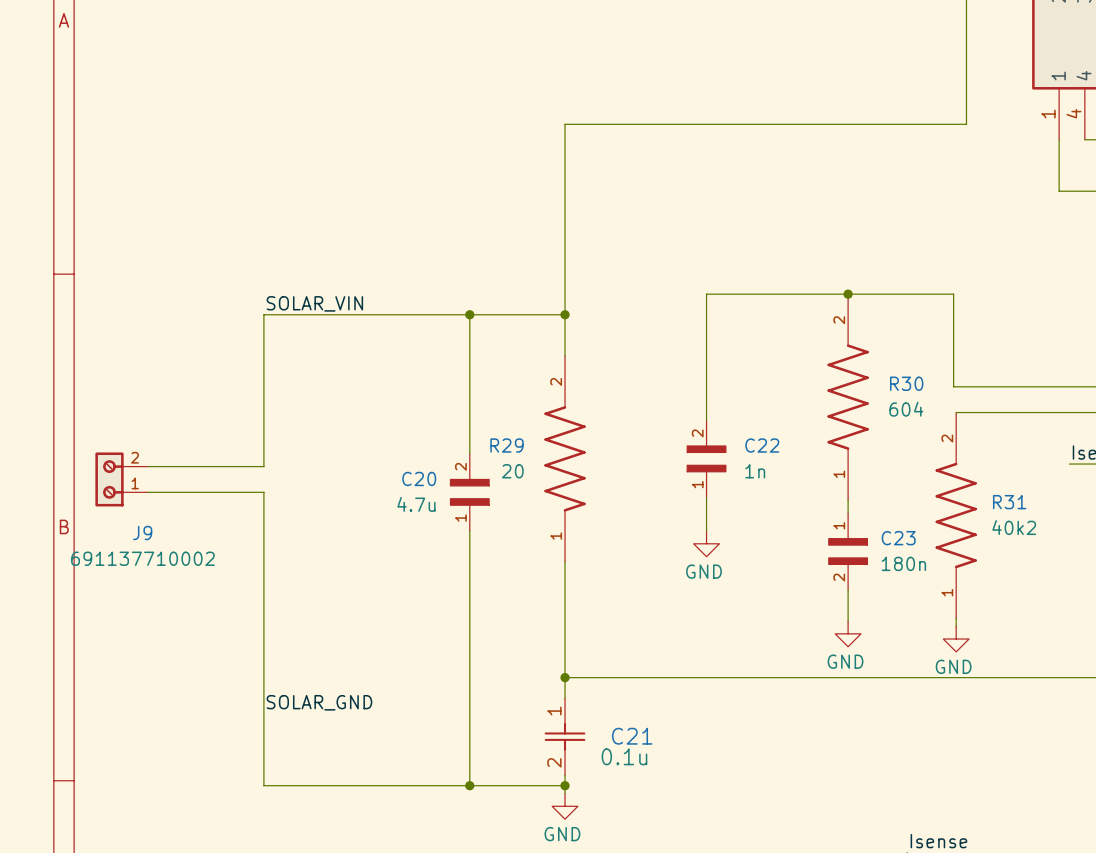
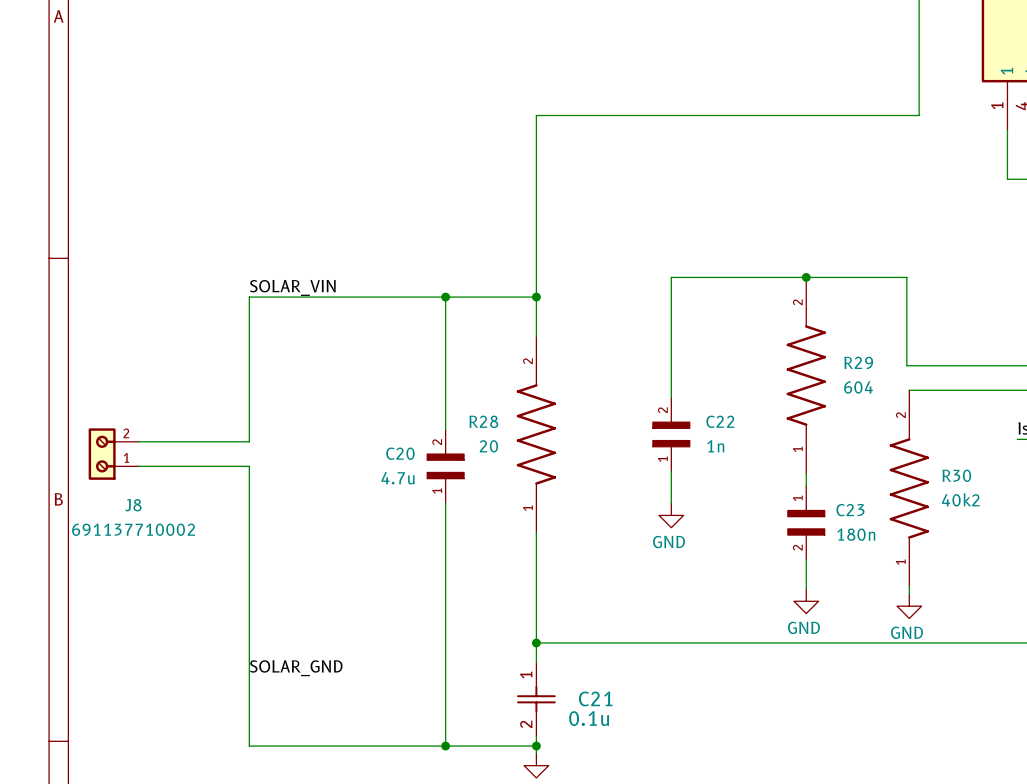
R30 name: R30 (906, 383) -> R29 (858, 362)
R29 name: R29 (507, 445) -> R28 (483, 421)
R31 name: R31 (1009, 502) -> R30 (956, 475)
J9 name: J9 (142, 533) -> J8 (133, 505)

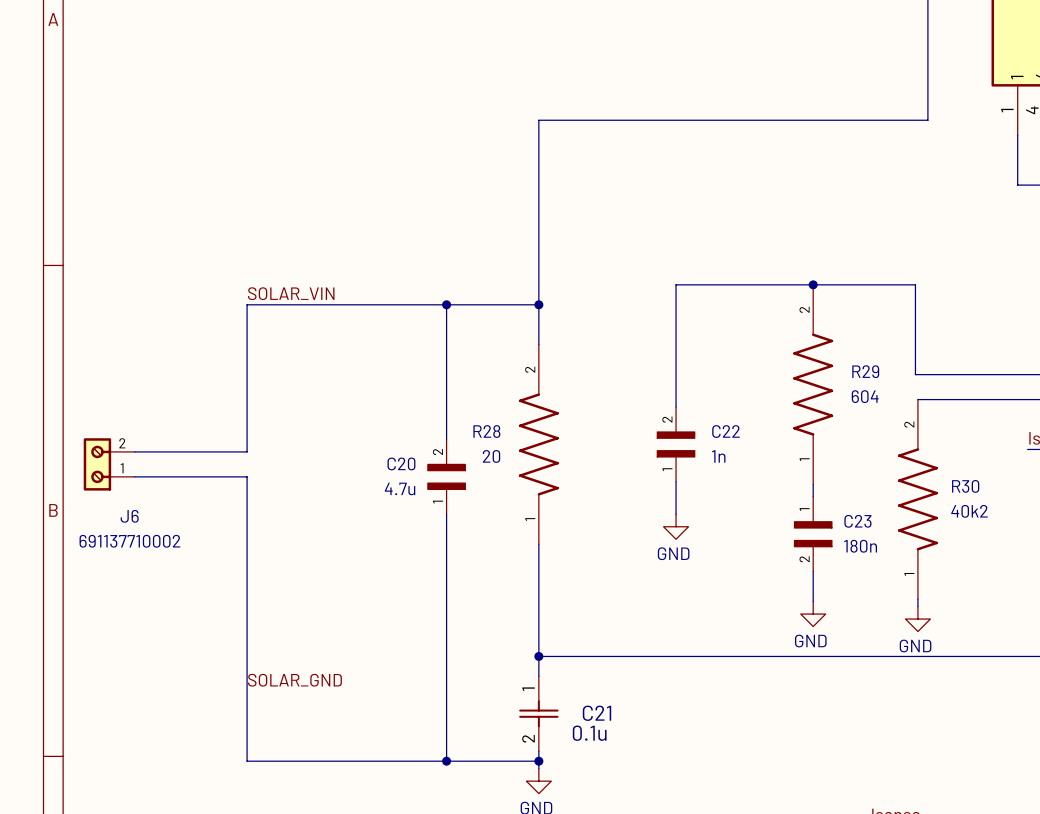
J8 name: J8 (133, 505) -> J6 (129, 516)

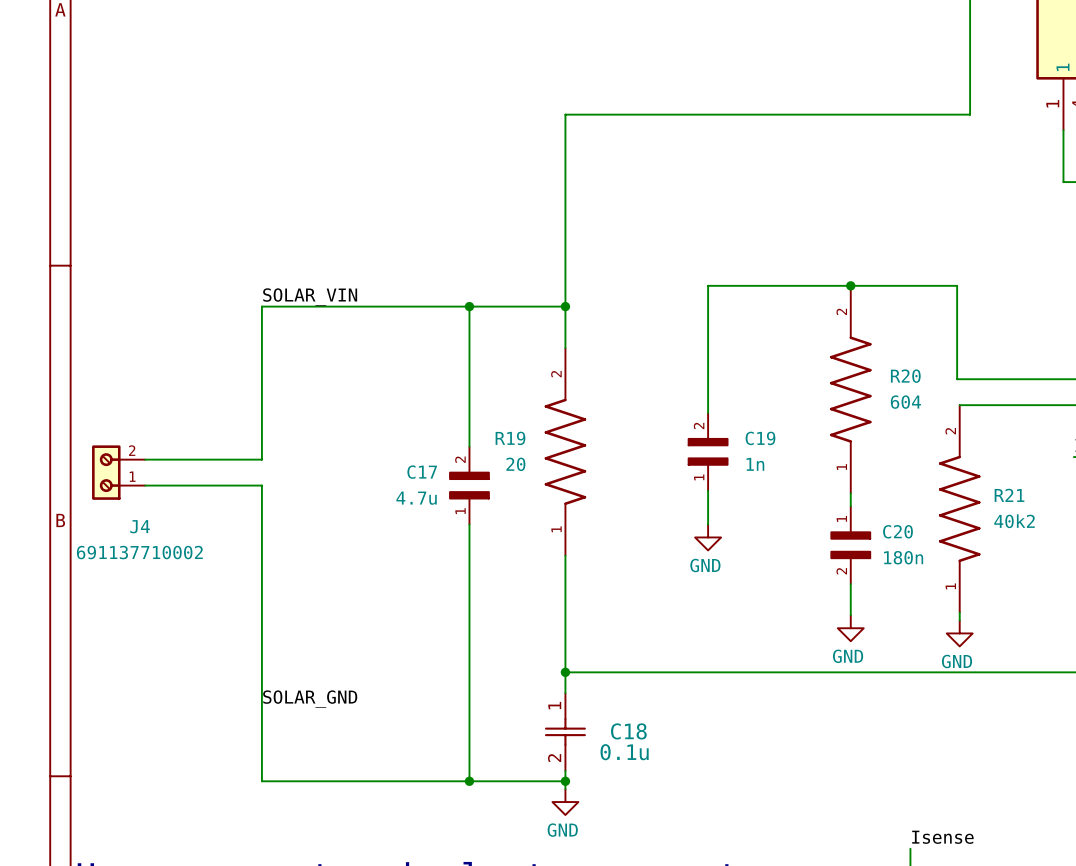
R29 name: R29 (865, 371) -> R20 (905, 376)
R28 name: R28 (486, 431) -> R19 (510, 438)
C22 name: C22 (726, 431) -> C19 (760, 438)
C20 name: C20 (401, 463) -> C17 (422, 472)
R30 name: R30 (965, 486) -> R21 (1009, 495)
J6 name: J6 (129, 516) -> J4 (140, 526)
C23 name: C23 (857, 521) -> C20 (897, 531)
C21 name: C21 (597, 713) -> C18 (628, 731)

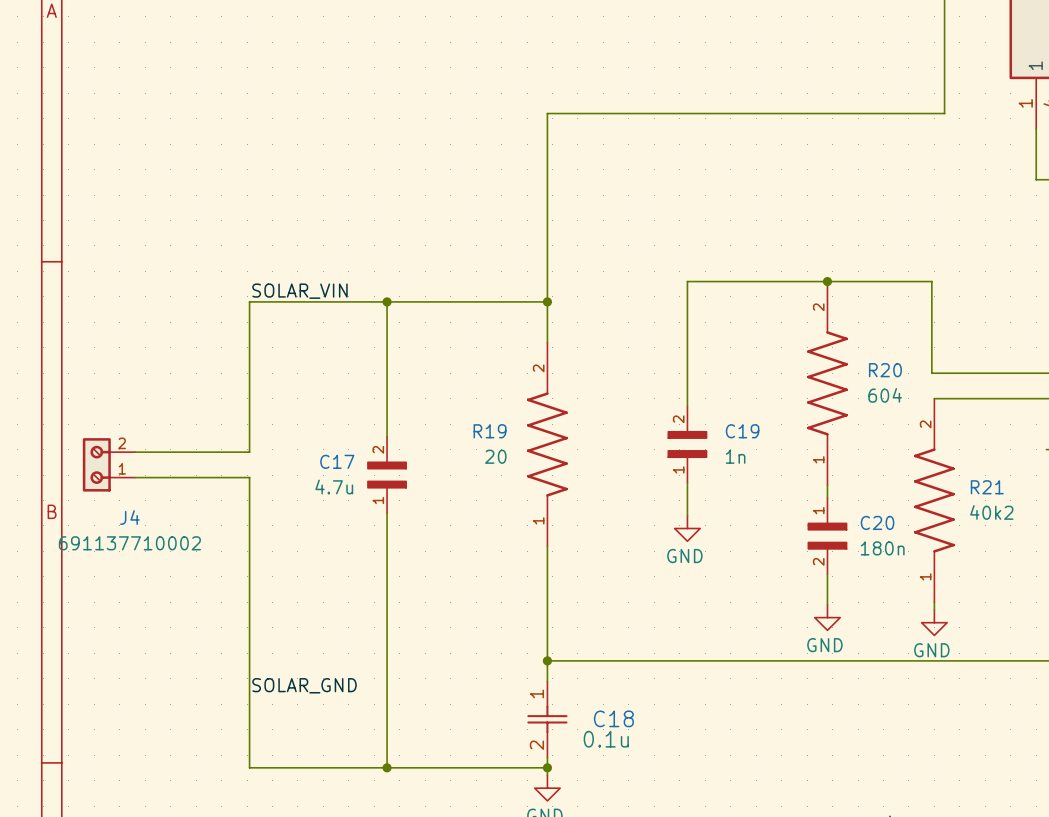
wire: none -> (387, 301) (387, 436)
junction: none -> (387, 301)
wire: (469, 306) (469, 446) -> none
junction: (469, 306) -> none
C17 position: (469, 485) -> (387, 475)
wire: none -> (387, 513) (387, 767)
wire: (469, 524) (469, 781) -> none
junction: none -> (387, 767)
junction: (469, 781) -> none

